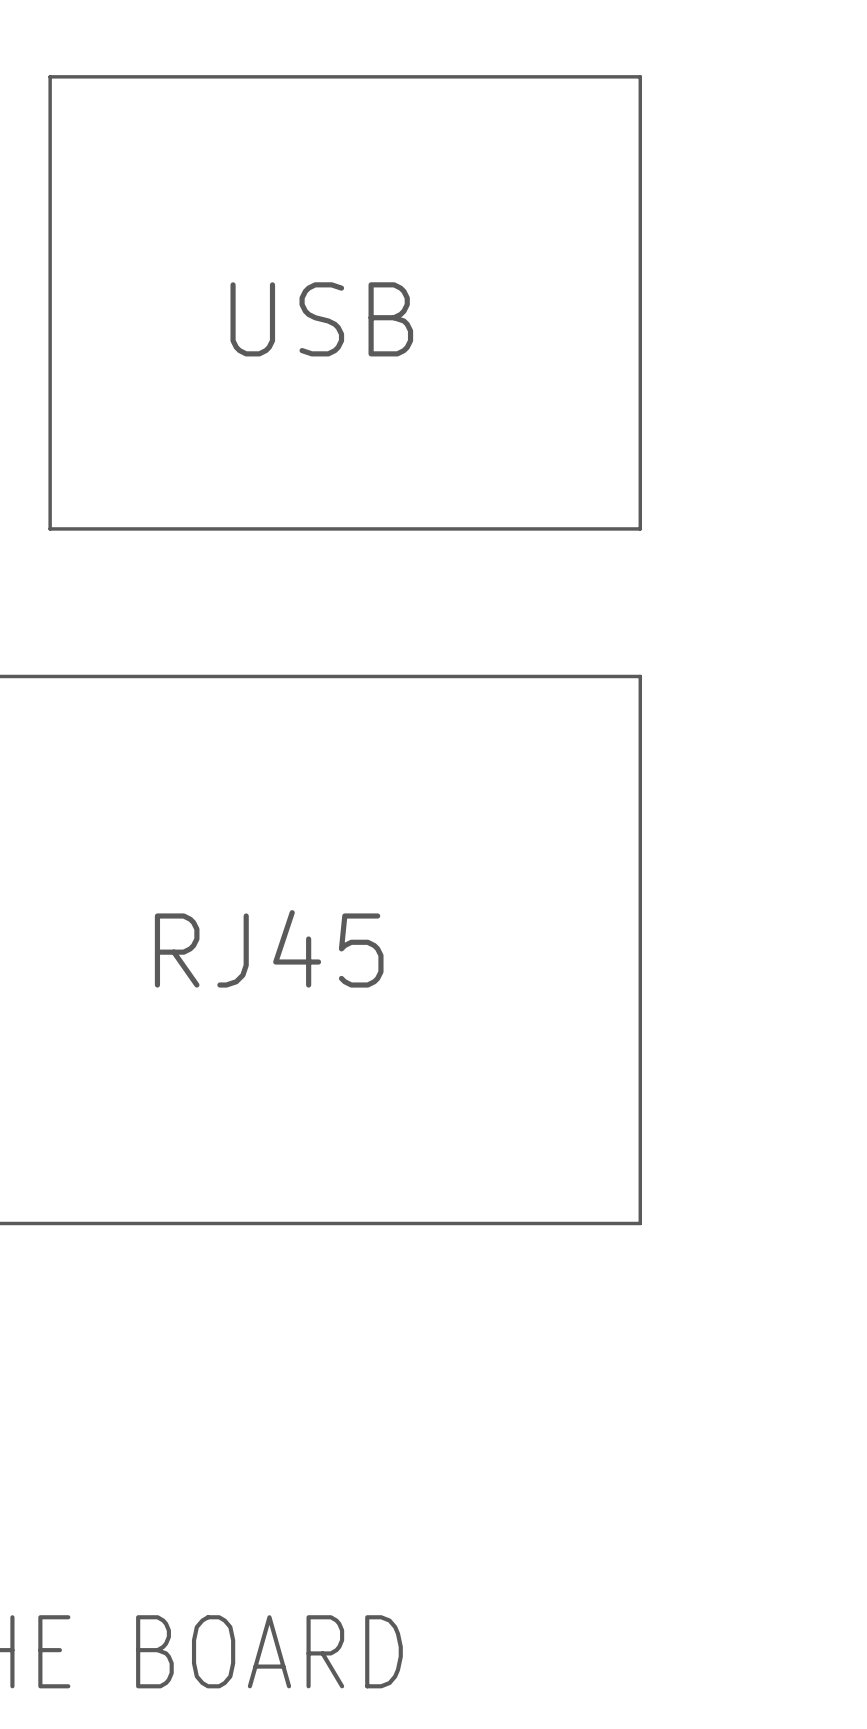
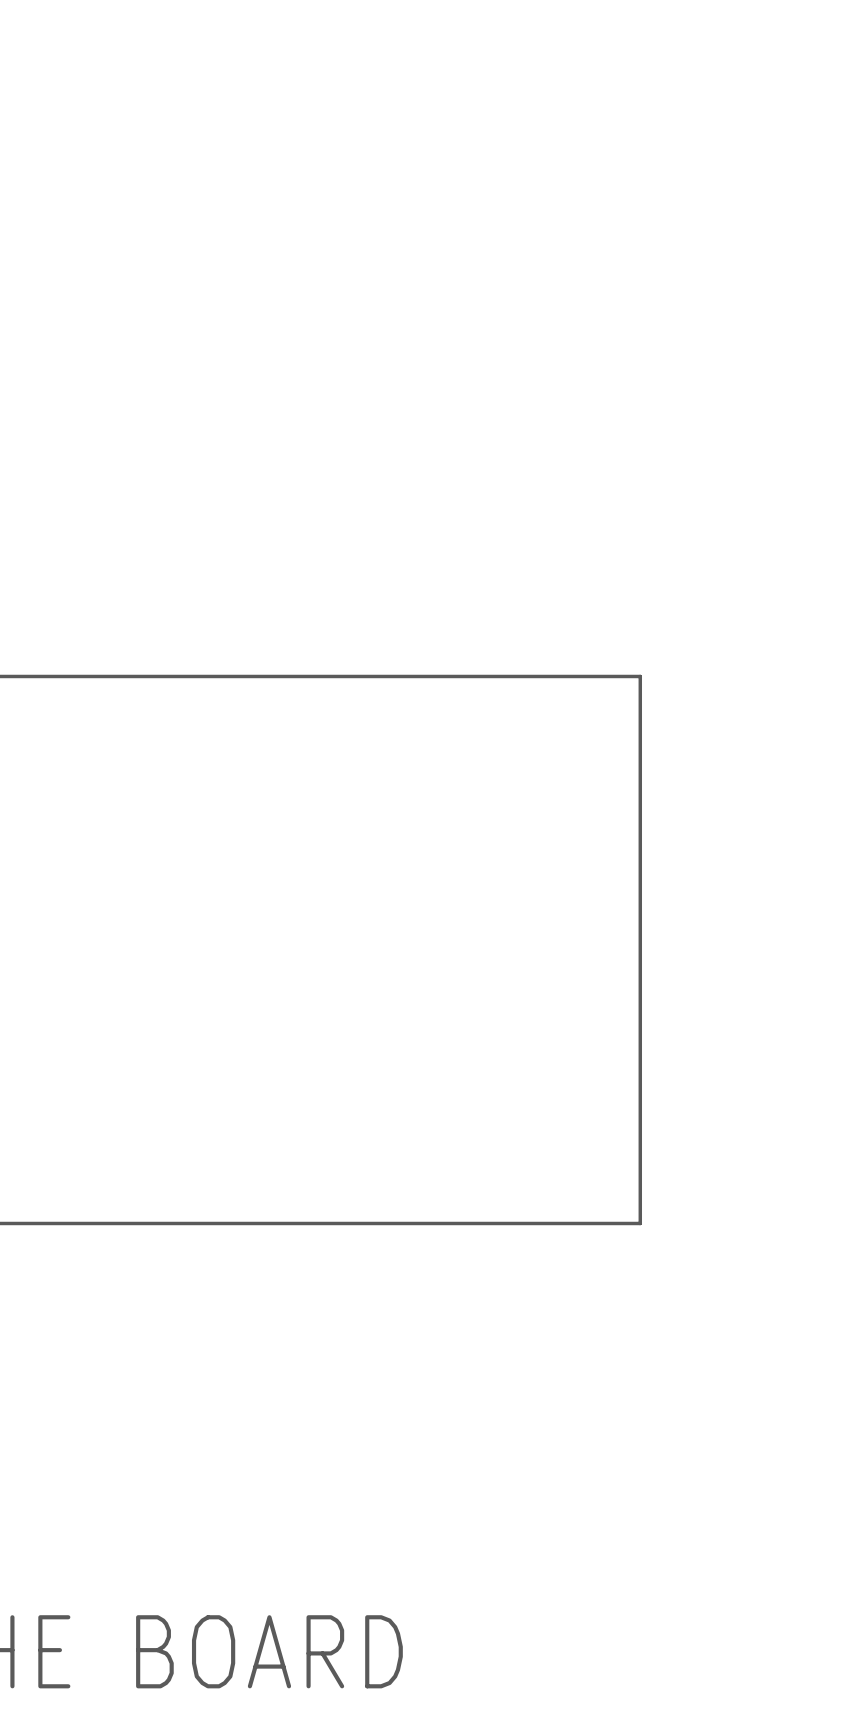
line: (50, 76) (640, 76) (640, 528) (50, 528) (50, 76) -> none
text: USB (321, 319) -> none
text: RJ45 (269, 948) -> none

